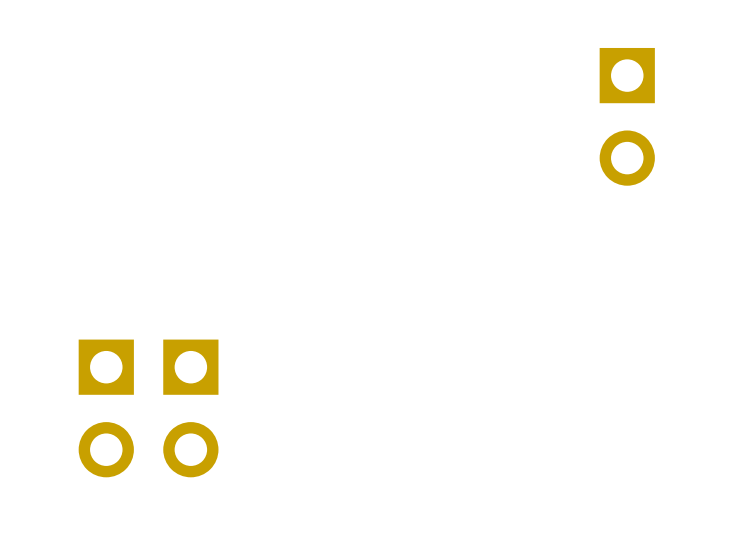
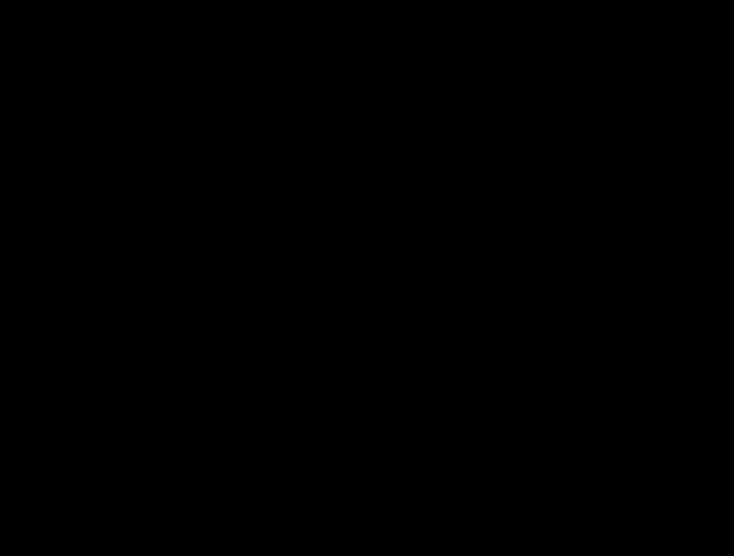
part: (627, 116) -> none
part: (106, 408) -> none
part: (190, 408) -> none

